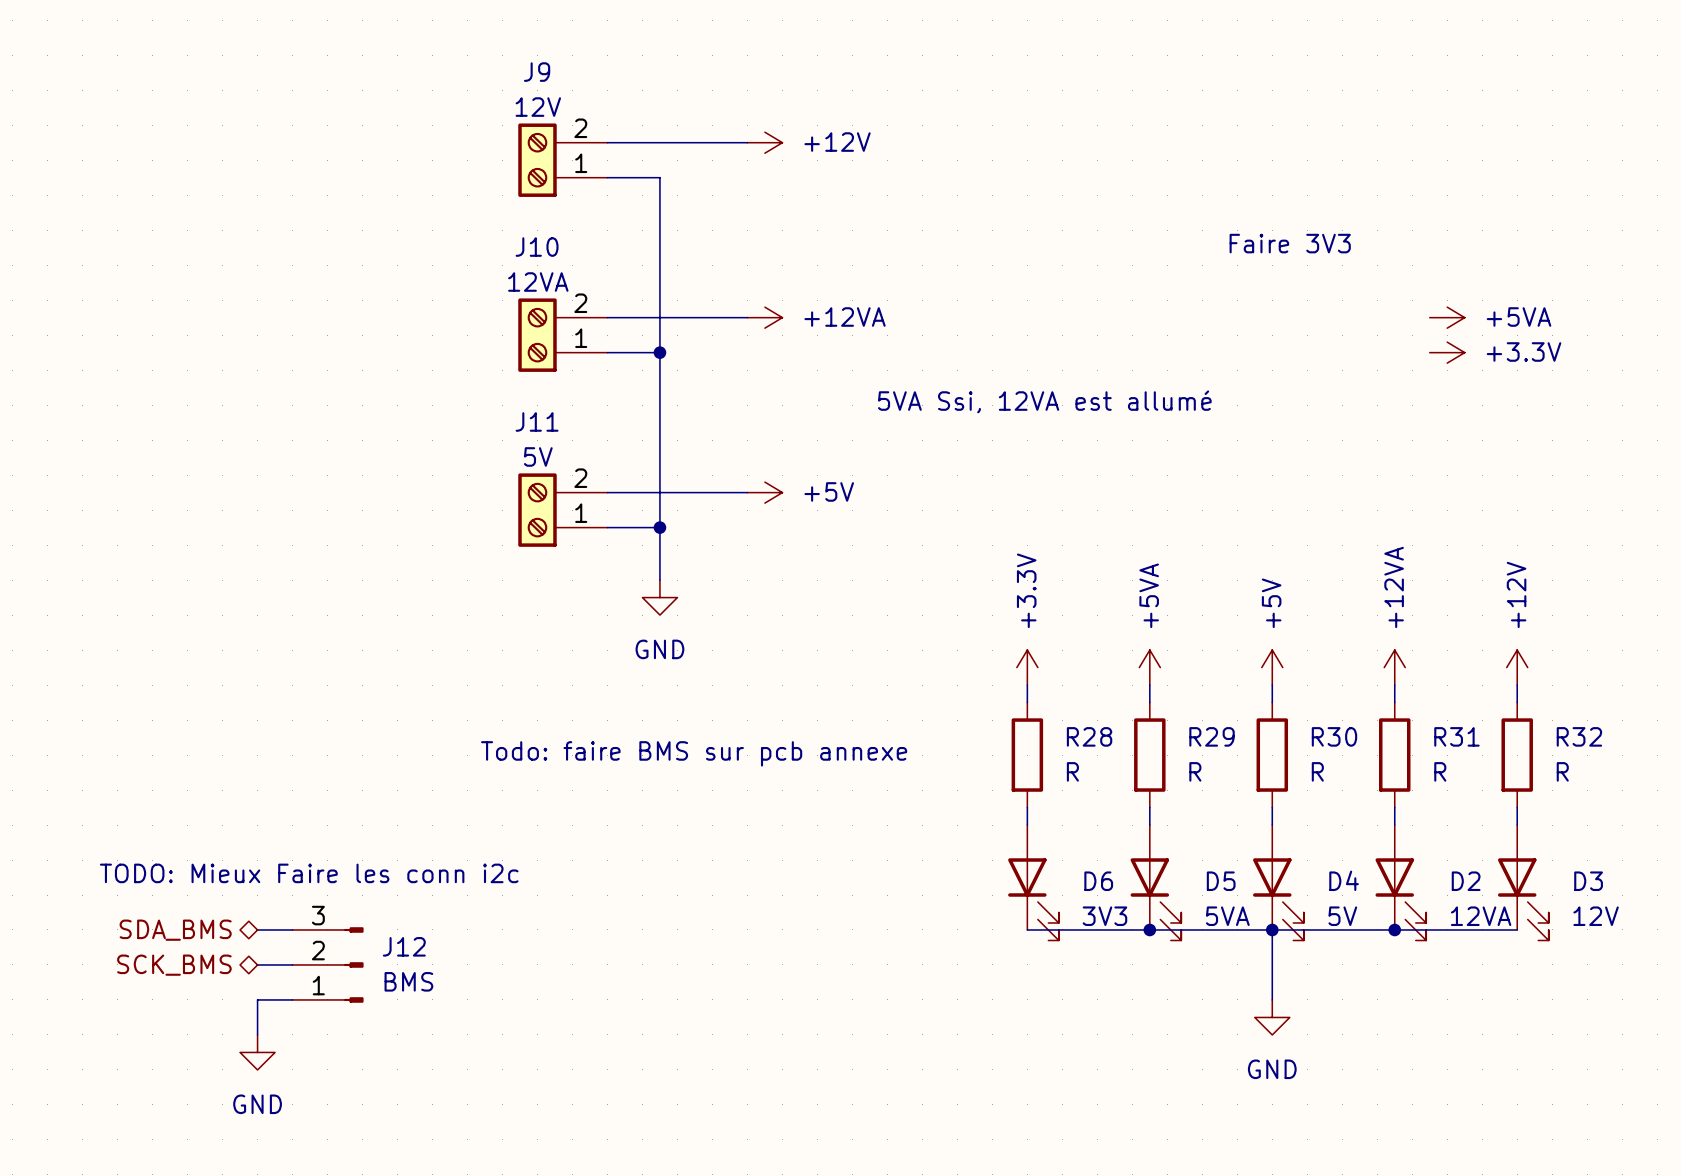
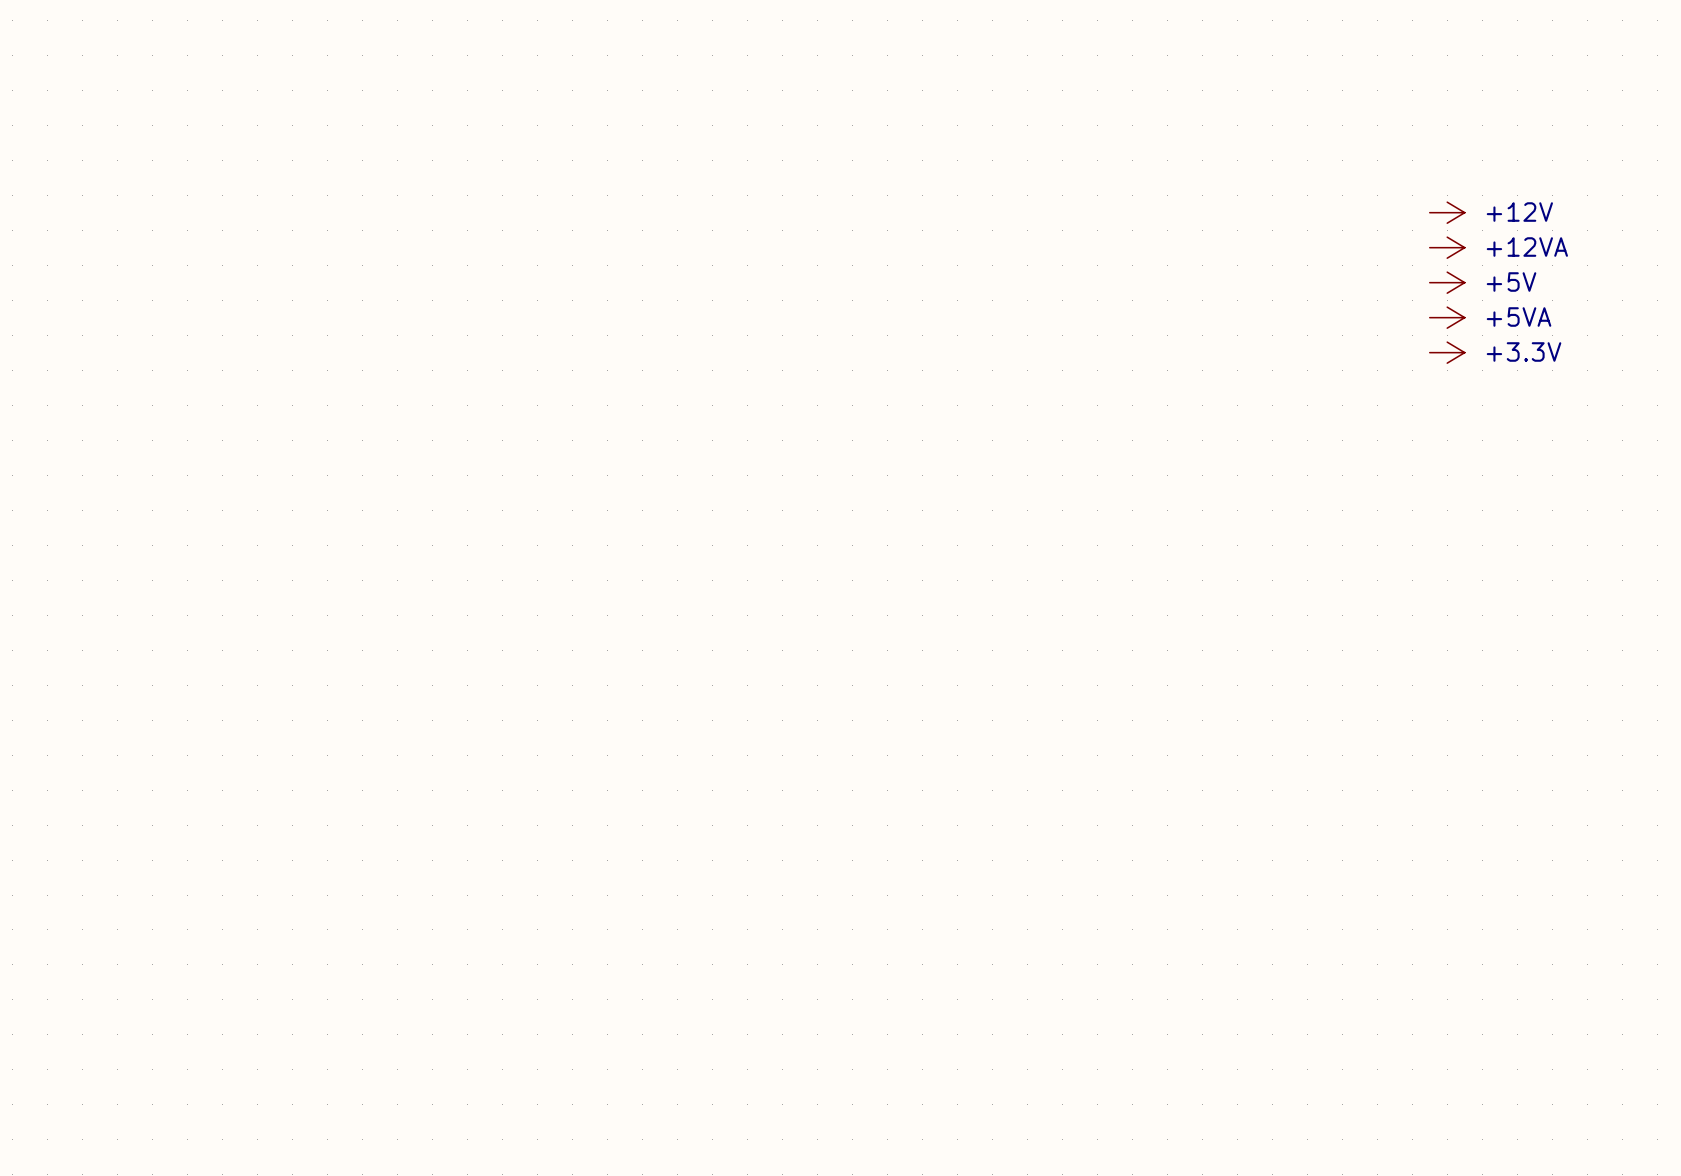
wire: (607, 142) (747, 142) -> none
power symbol: +12V (764, 142) -> none
J9: 12V (562, 160) -> none
wire: (607, 177) (659, 177) (659, 580) -> none
power symbol: none -> +12V (1447, 212)
text: Faire 3V3 (1290, 243) -> none
power symbol: none -> +12VA (1447, 247)
power symbol: none -> +5V (1447, 282)
wire: (607, 317) (747, 317) -> none
power symbol: +12VA (764, 317) -> none
J10: 12VA (562, 335) -> none
wire: (607, 352) (659, 352) -> none
junction: (659, 352) -> none
text: 5VA Ssi, 12VA est allumé (1044, 401) -> none
wire: (607, 492) (747, 492) -> none
power symbol: +5V (764, 492) -> none
J11: 5V (562, 510) -> none
wire: (607, 527) (659, 527) -> none
junction: (659, 527) -> none
power symbol: GND (659, 597) -> none
power symbol: +3.3V (1027, 667) -> none
power symbol: +5VA (1149, 667) -> none
power symbol: +5V (1272, 667) -> none
power symbol: +12VA (1394, 667) -> none
power symbol: +12V (1517, 667) -> none
wire: (1027, 685) (1027, 702) -> none
wire: (1149, 685) (1149, 702) -> none
wire: (1272, 685) (1272, 702) -> none
wire: (1394, 685) (1394, 702) -> none
wire: (1517, 685) (1517, 702) -> none
text: Todo: faire BMS sur pcb annexe (694, 753) -> none
R28: R (1027, 755) -> none
R29: R (1149, 755) -> none
R30: R (1272, 755) -> none
R31: R (1394, 755) -> none
R32: R (1517, 755) -> none
wire: (1027, 807) (1027, 825) -> none
wire: (1149, 807) (1149, 825) -> none
wire: (1272, 807) (1272, 825) -> none
wire: (1394, 807) (1394, 825) -> none
wire: (1517, 807) (1517, 825) -> none
text: TODO: Mieux Faire les conn i2c (309, 873) -> none
D6: 3V3 (1033, 882) -> none
D5: 5VA (1155, 882) -> none
D4: 5V (1278, 882) -> none
D2: 12VA (1400, 882) -> none
D3: 12V (1523, 882) -> none
wire: (257, 929) (292, 929) -> none
wire: (1027, 929) (1517, 929) -> none
junction: (1149, 929) -> none
wire: (1272, 929) (1272, 999) -> none
junction: (1272, 929) -> none
junction: (1394, 929) -> none
hierarchical label: SDA_BMS (175, 930) -> none
wire: (257, 964) (292, 964) -> none
J12: BMS (328, 964) -> none
hierarchical label: SCK_BMS (174, 965) -> none
wire: (292, 999) (257, 999) (257, 1034) -> none
power symbol: GND (1272, 1017) -> none
power symbol: GND (257, 1052) -> none

